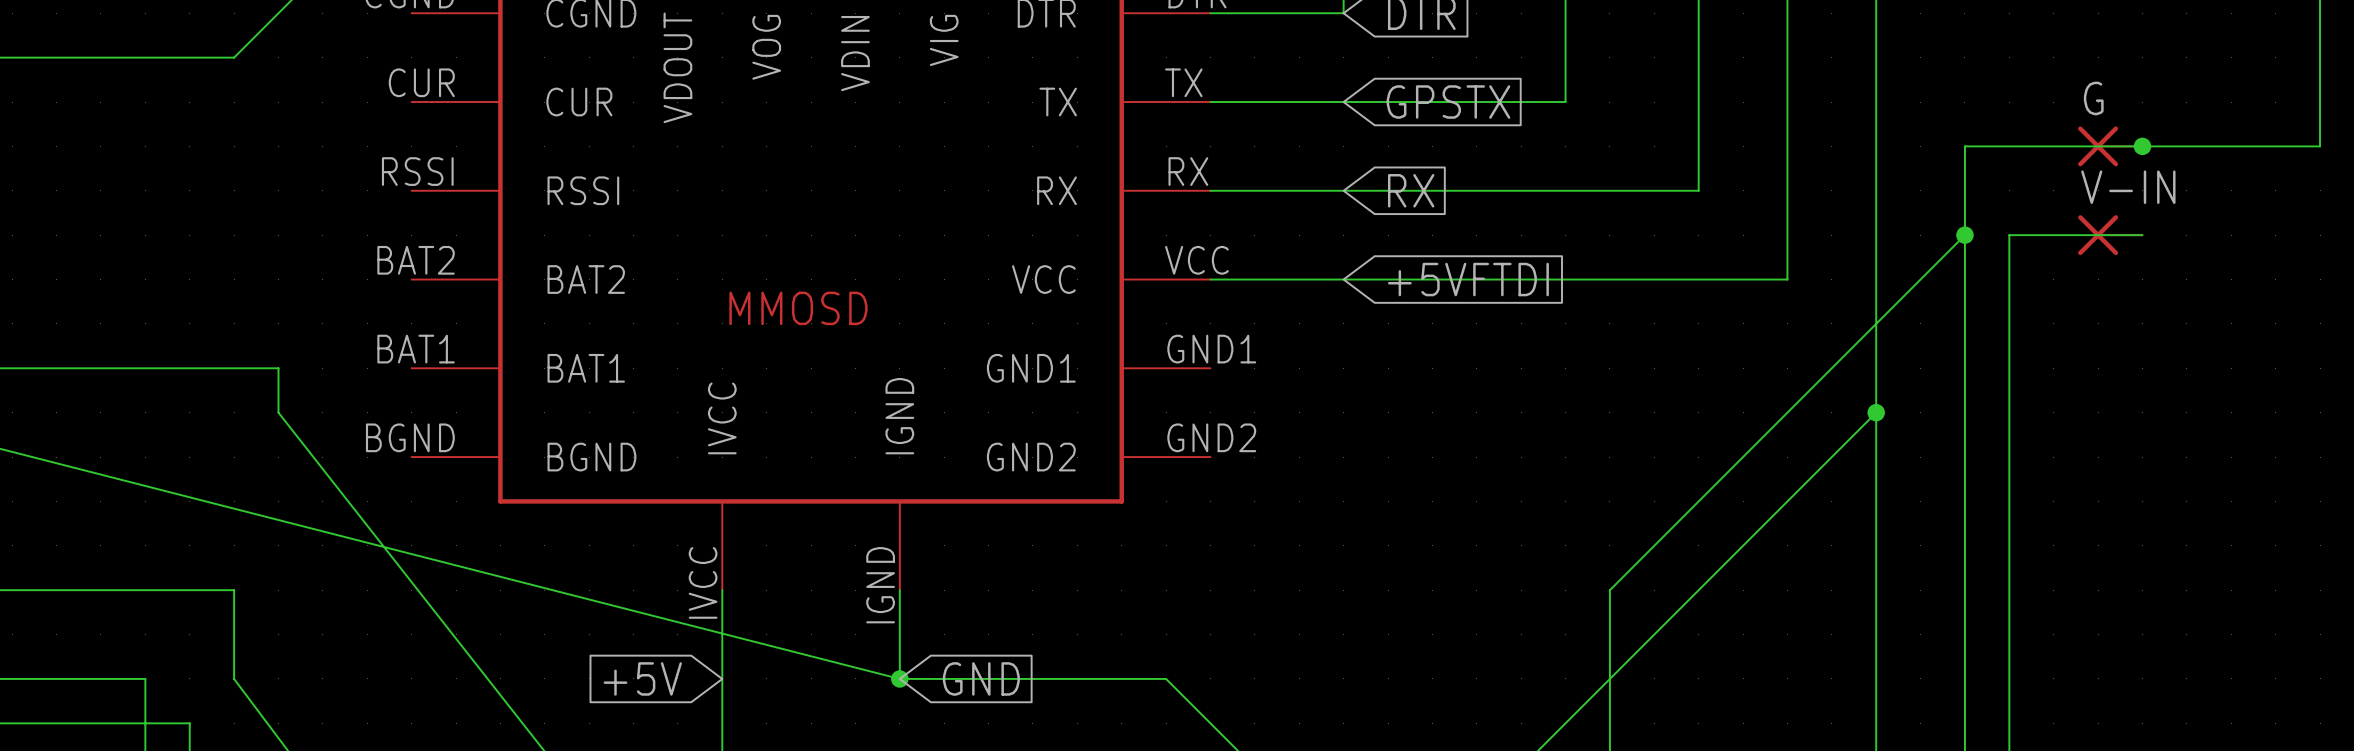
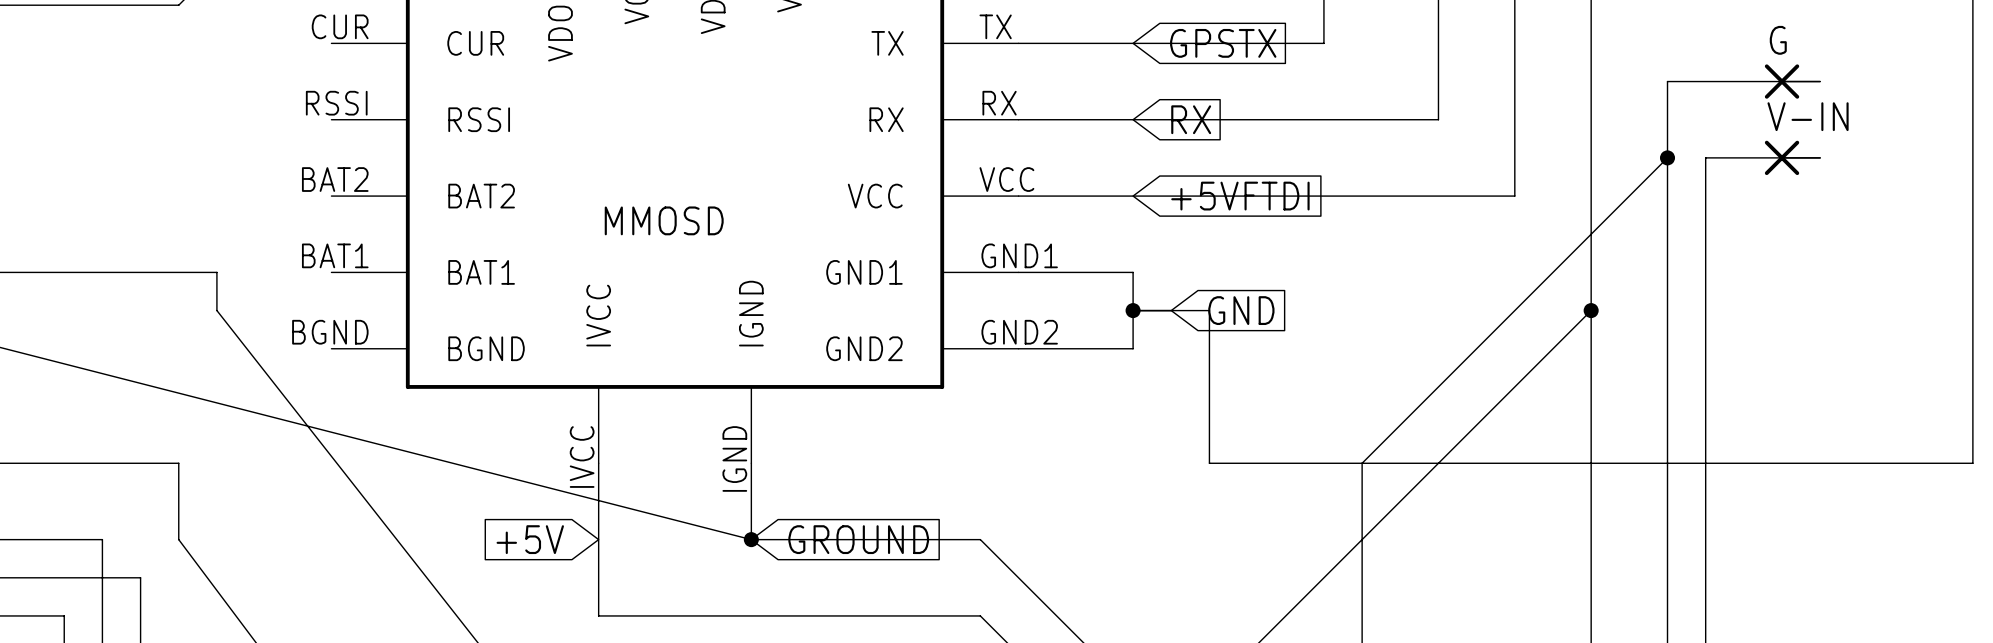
wire: (2142, 146) (2320, 146) -> (1133, 310) (1209, 310) (1209, 463) (1972, 463) (1972, 81)
junction: (2142, 146) -> none
wire: none -> (1018, 272) (1133, 272) (1133, 348) (1018, 348)
junction: none -> (1133, 310)
global label: none -> GND (1241, 310)
global label: GND (981, 678) -> GROUND (858, 539)

